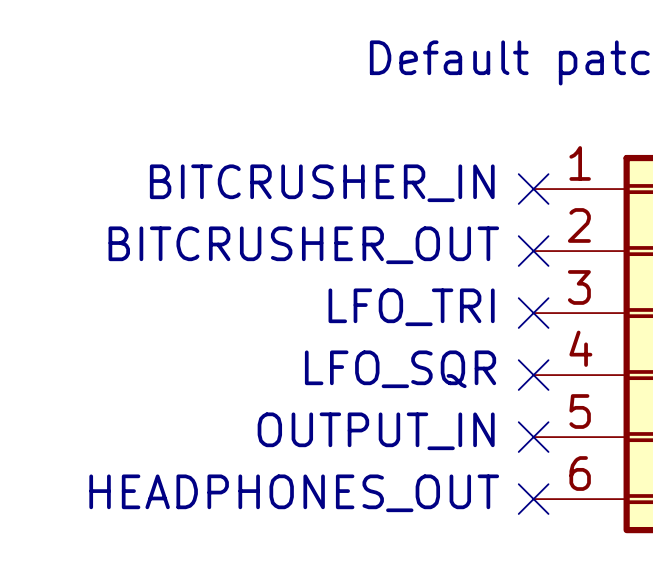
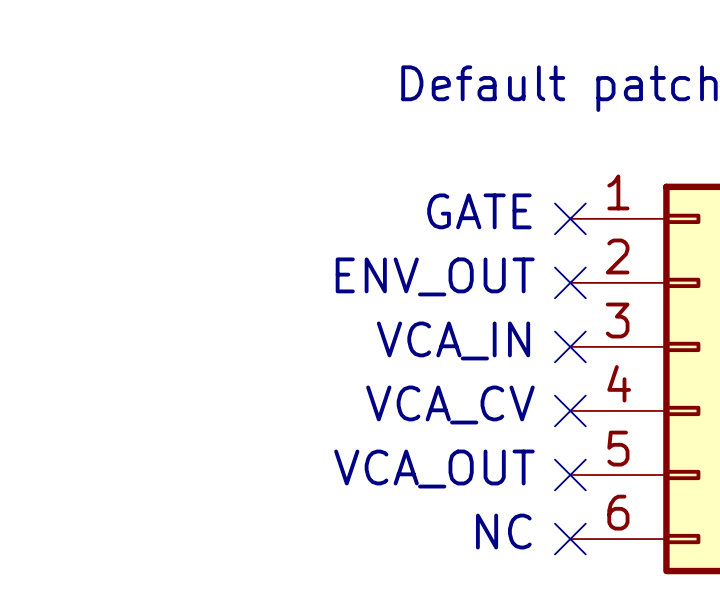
text: BITCRUSHER_IN (322, 183) -> GATE (479, 211)
text: BITCRUSHER_OUT (303, 245) -> ENV_OUT (435, 276)
text: LFO_TRI (411, 307) -> VCA_IN (453, 340)
text: LFO_SQR (400, 369) -> VCA_CV (450, 404)
text: OUTPUT_IN (376, 431) -> VCA_OUT (434, 469)
text: HEADPHONES_OUT (294, 493) -> NC (503, 531)

